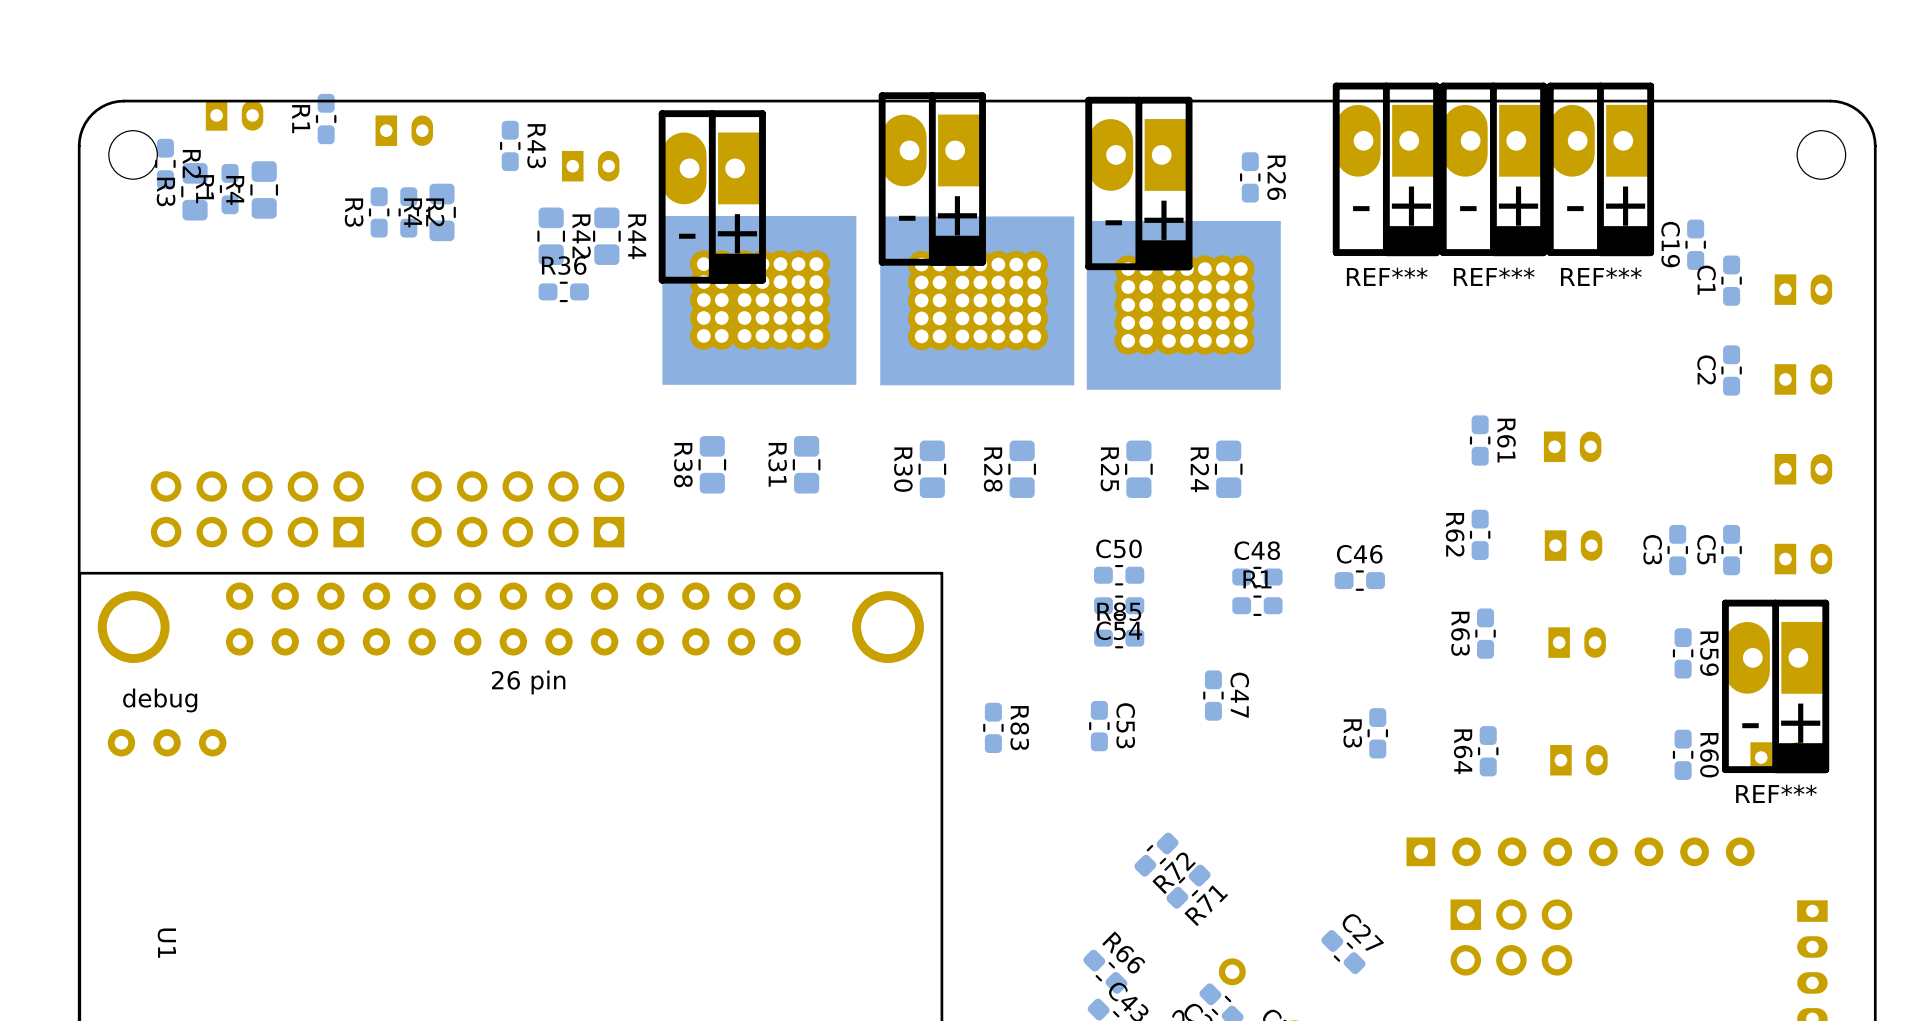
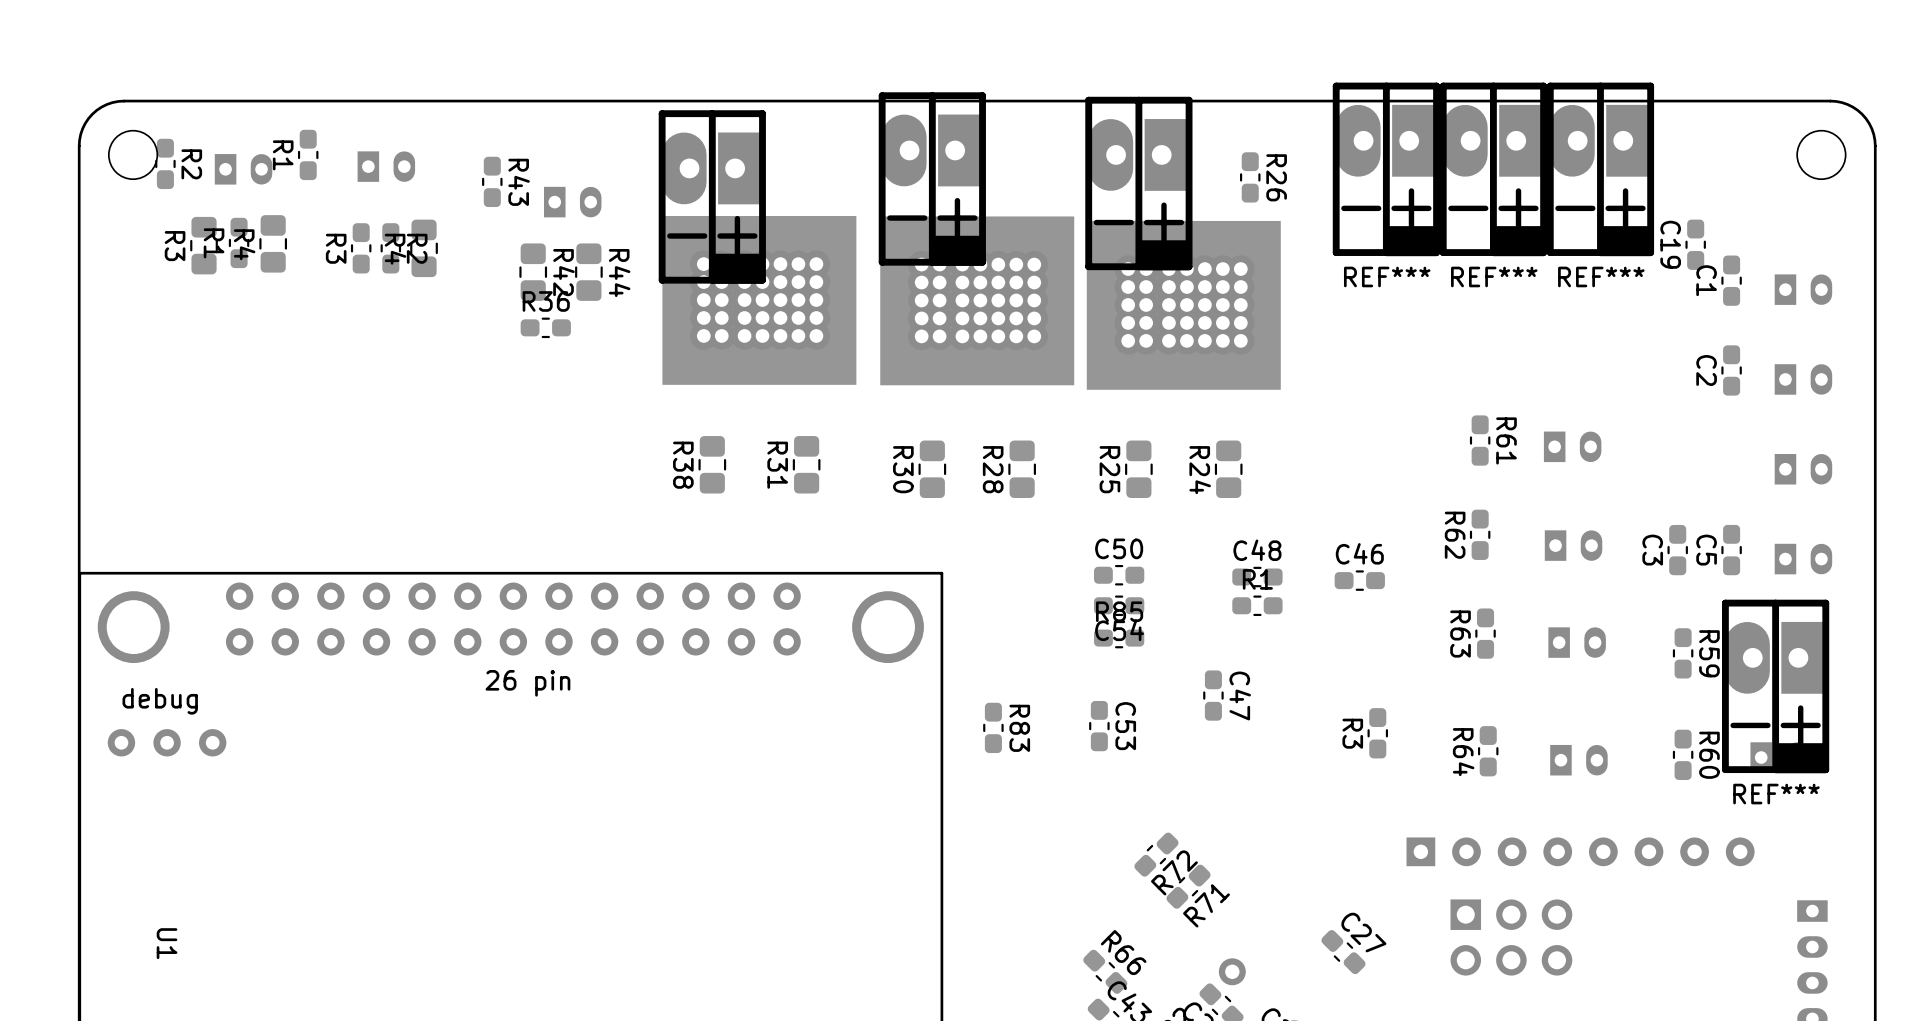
part position: (234, 115) -> (243, 169)
R1 position: (326, 119) -> (308, 154)
part position: (404, 130) -> (386, 166)
R43 position: (510, 145) -> (492, 181)
part position: (590, 166) -> (572, 202)
R1: (230, 189) -> none
R4 position: (264, 189) -> (273, 243)
R3 position: (195, 191) -> (204, 245)
R3 position: (379, 212) -> (361, 248)
R2 position: (408, 212) -> (390, 248)
R4 position: (442, 212) -> (424, 248)
R42 position: (551, 236) -> (533, 272)
R44 position: (606, 236) -> (588, 272)
R1: none -> (239, 242)
R36 position: (563, 291) -> (545, 327)
part: (257, 509) -> none
part: (517, 509) -> none

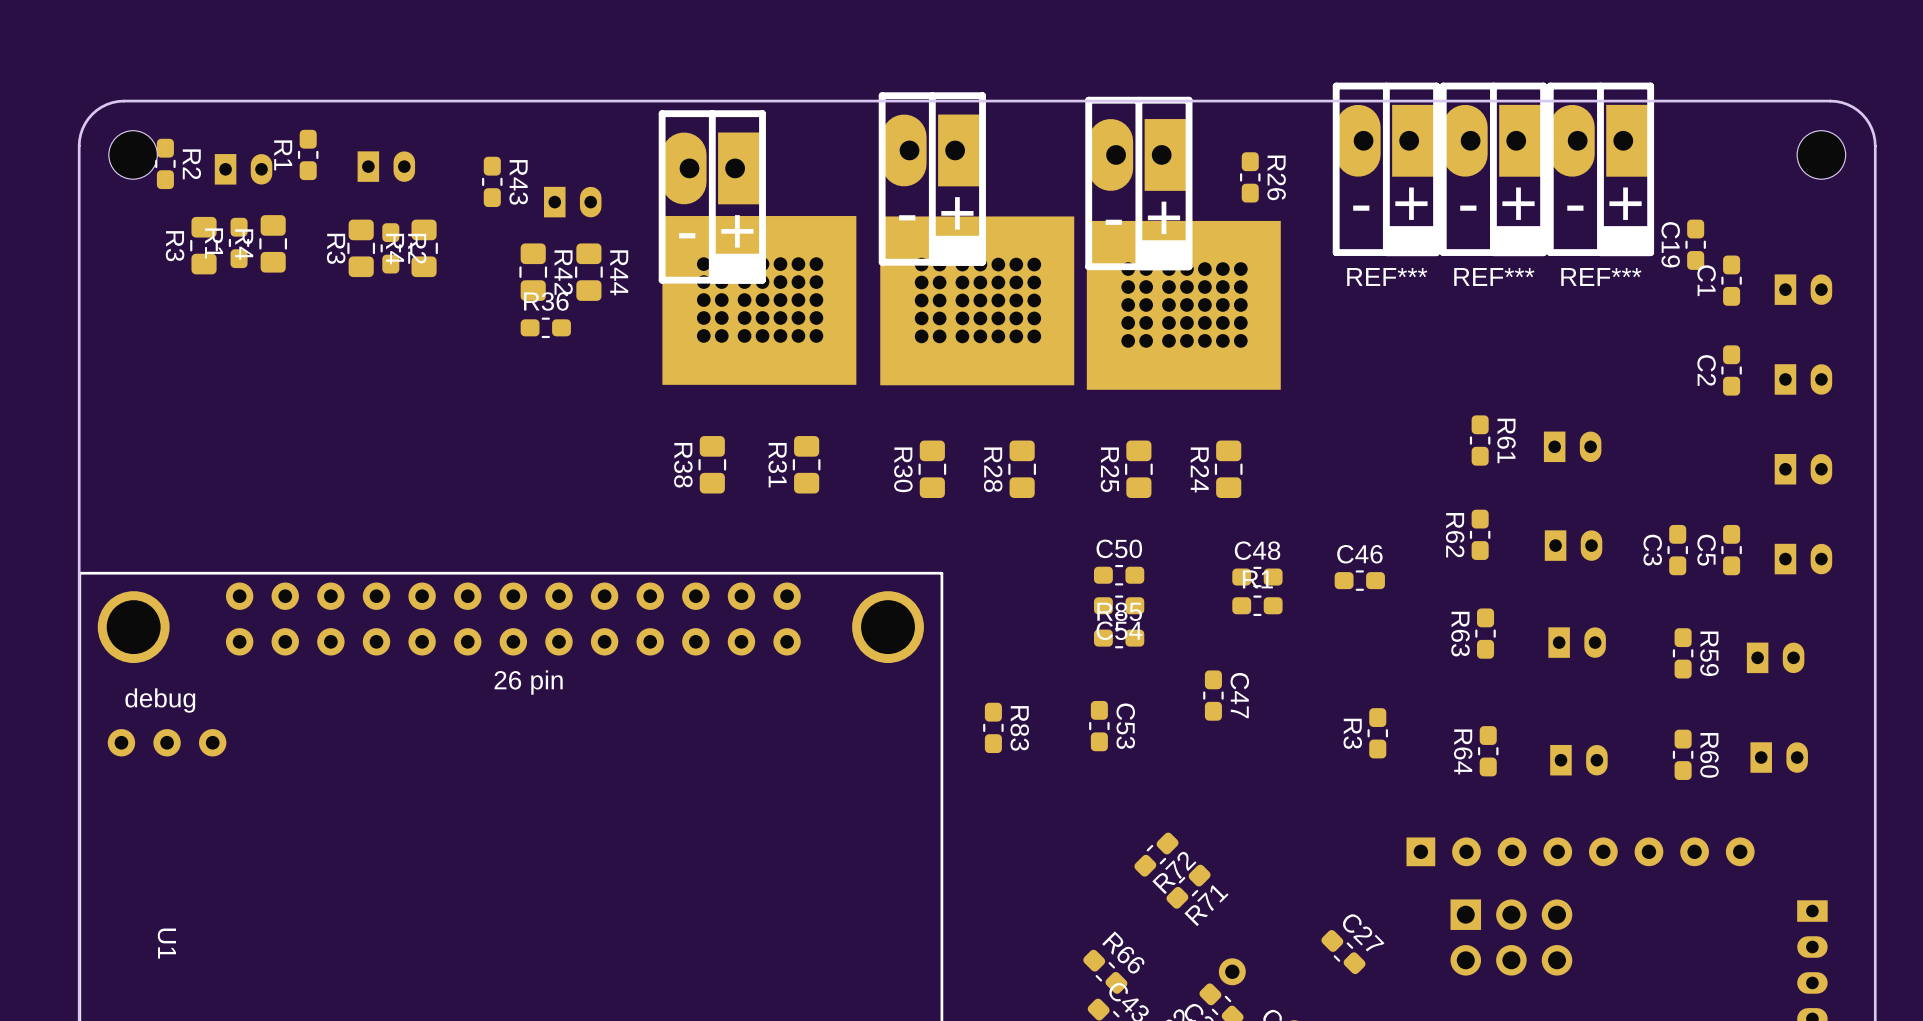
R3 footprint: [350, 223, 372, 274] -> [347, 219, 376, 278]
part: none -> (1775, 657)
part: (1775, 686) -> none

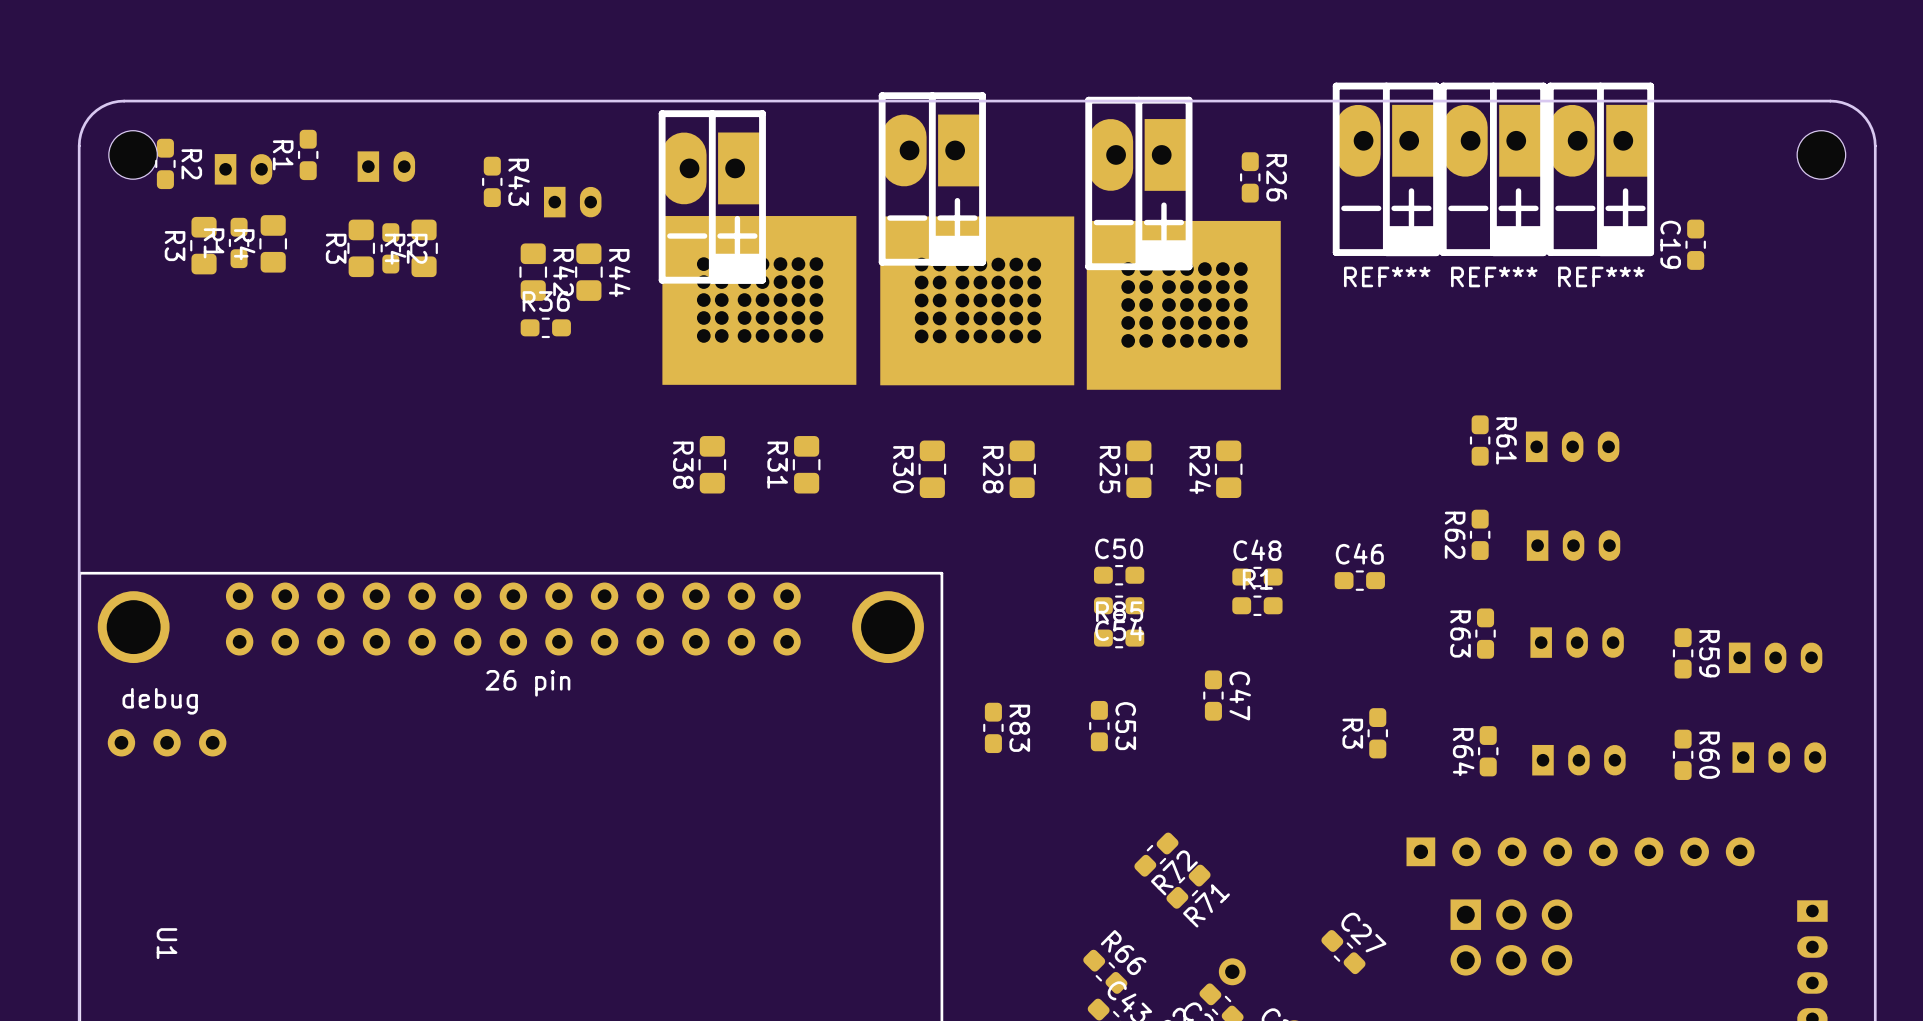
C1: (1731, 280) -> none
part: (1803, 289) -> none
C2: (1731, 370) -> none
part: (1803, 379) -> none
part footprint: [1543, 431, 1602, 463] -> [1525, 431, 1620, 463]
part: (1803, 469) -> none
part footprint: [1544, 530, 1603, 561] -> [1526, 530, 1621, 561]
C3: (1677, 550) -> none
C5: (1731, 550) -> none
part: (1803, 559) -> none
part footprint: [1548, 627, 1606, 658] -> [1530, 627, 1624, 658]
part footprint: [1746, 642, 1805, 674] -> [1728, 642, 1823, 674]
part footprint: [1750, 742, 1808, 773] -> [1732, 742, 1826, 773]
part footprint: [1550, 744, 1608, 776] -> [1532, 744, 1626, 776]

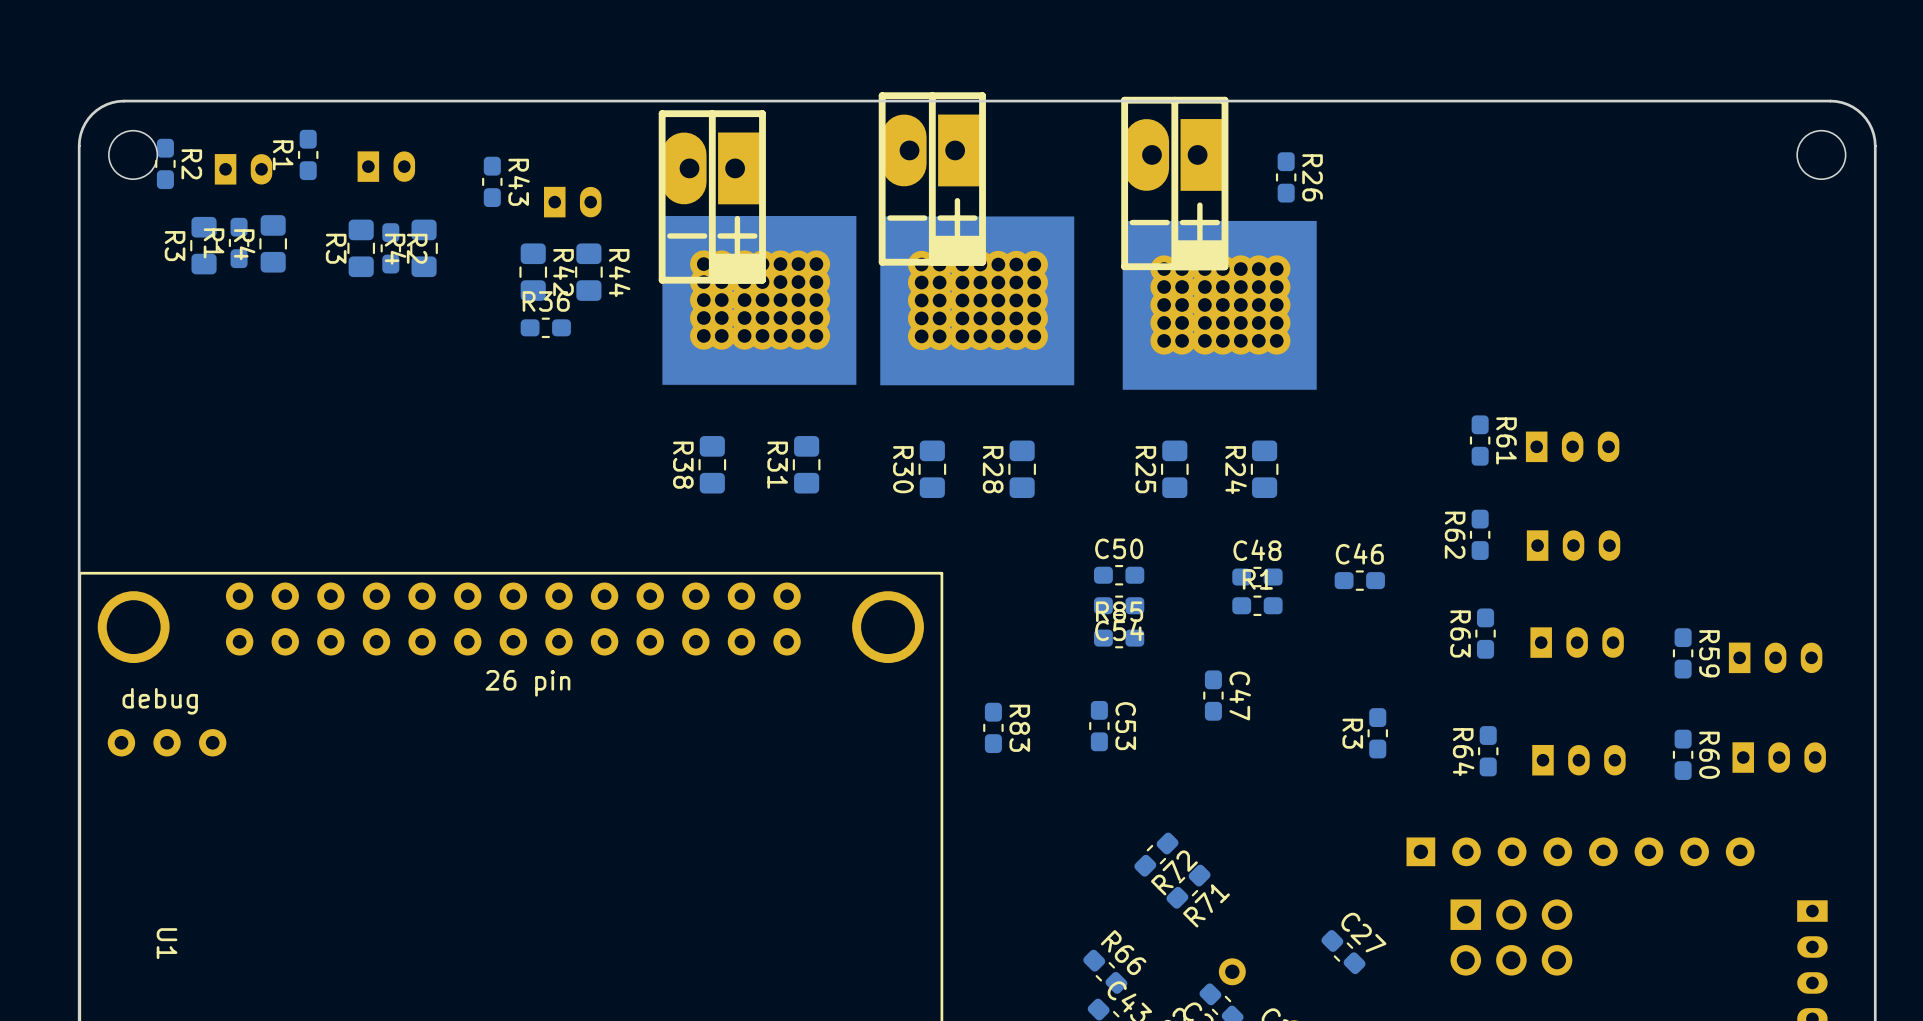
part: (1386, 169) -> none
part: (1493, 169) -> none
part: (1600, 169) -> none
R26 position: (1250, 177) -> (1286, 177)
part position: (1138, 183) -> (1174, 183)
C19: (1695, 244) -> none
part position: (1183, 305) -> (1219, 305)
R25 position: (1138, 469) -> (1174, 469)
R24 position: (1228, 469) -> (1264, 469)

